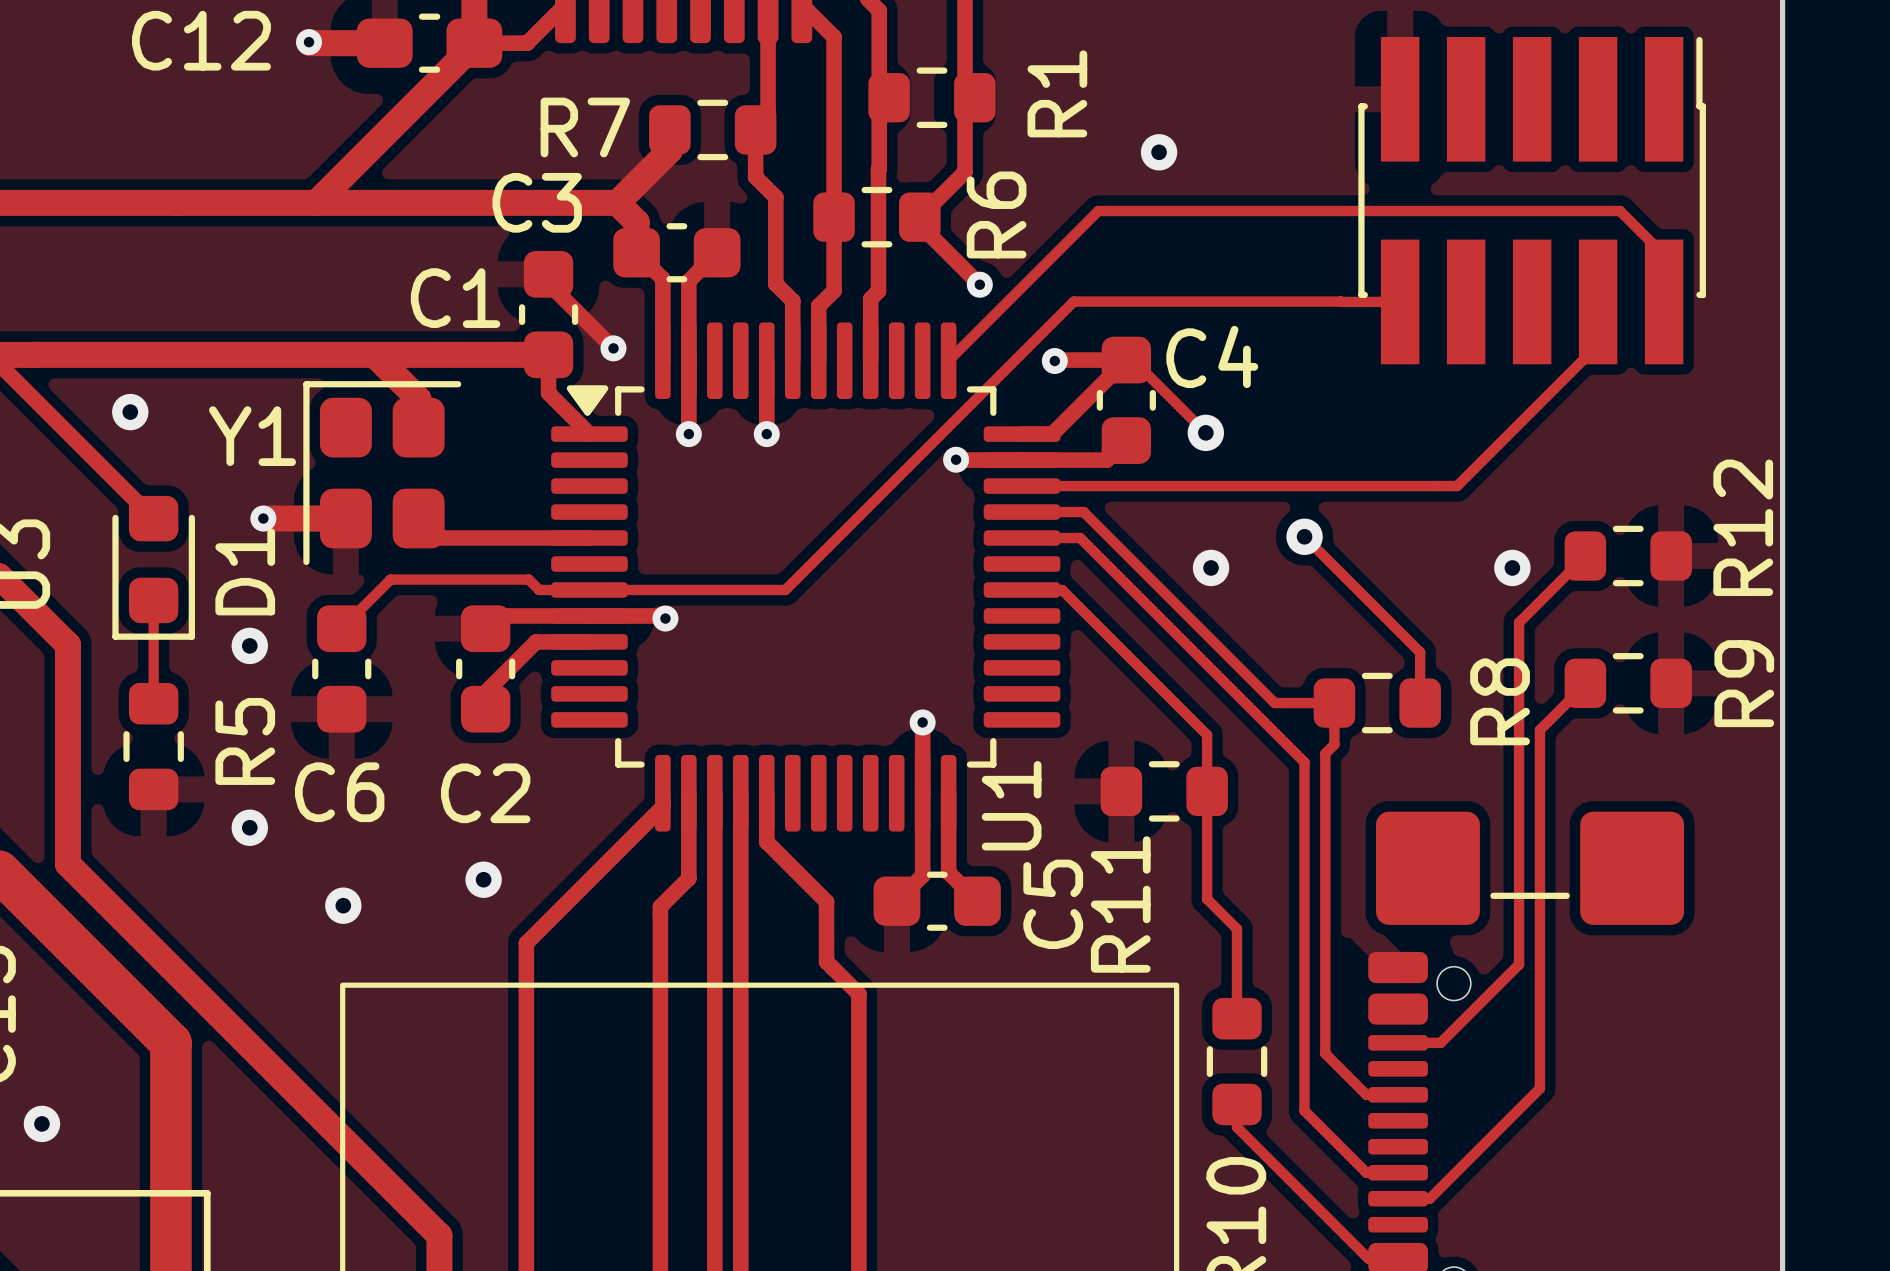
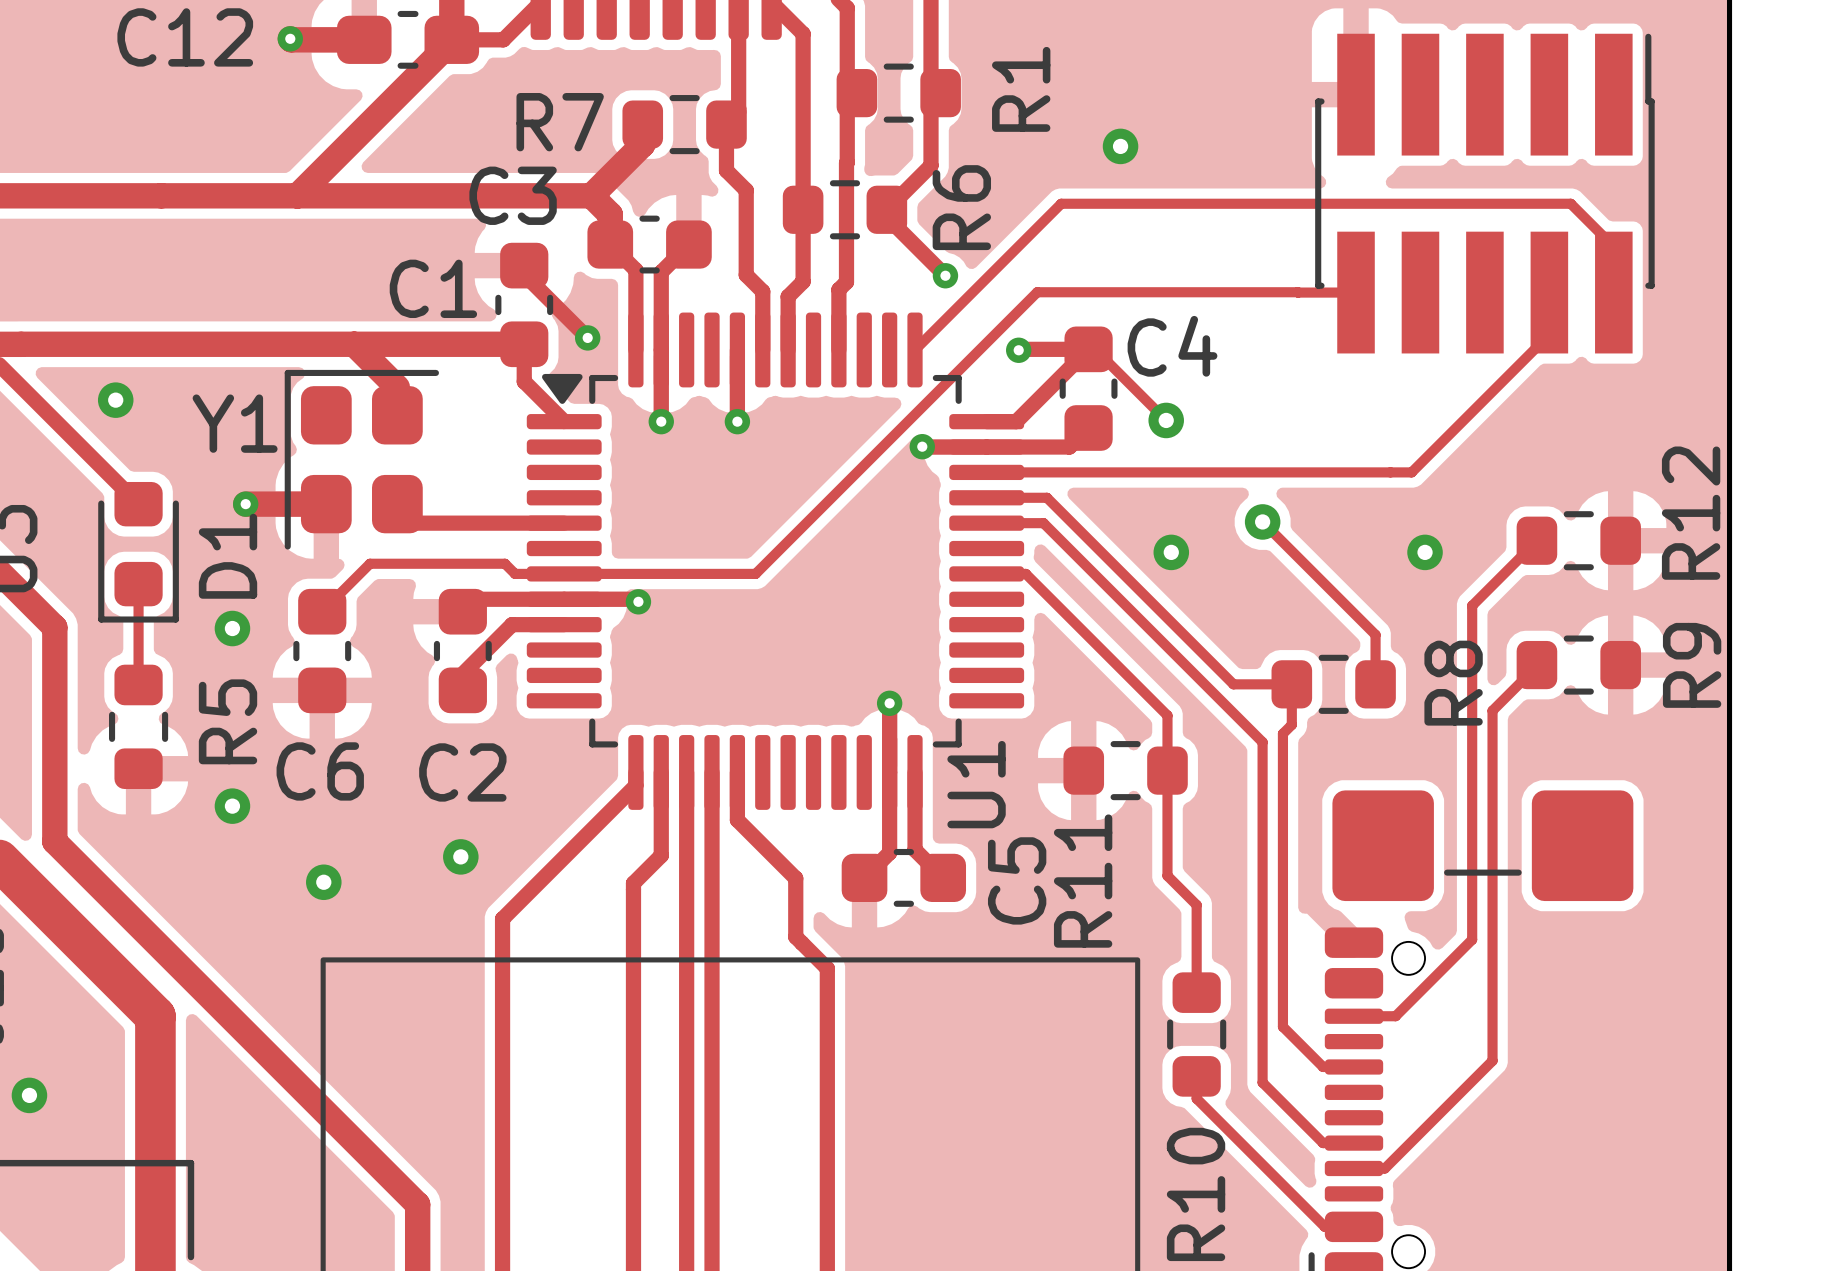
via position: (1512, 567) -> (1425, 552)

